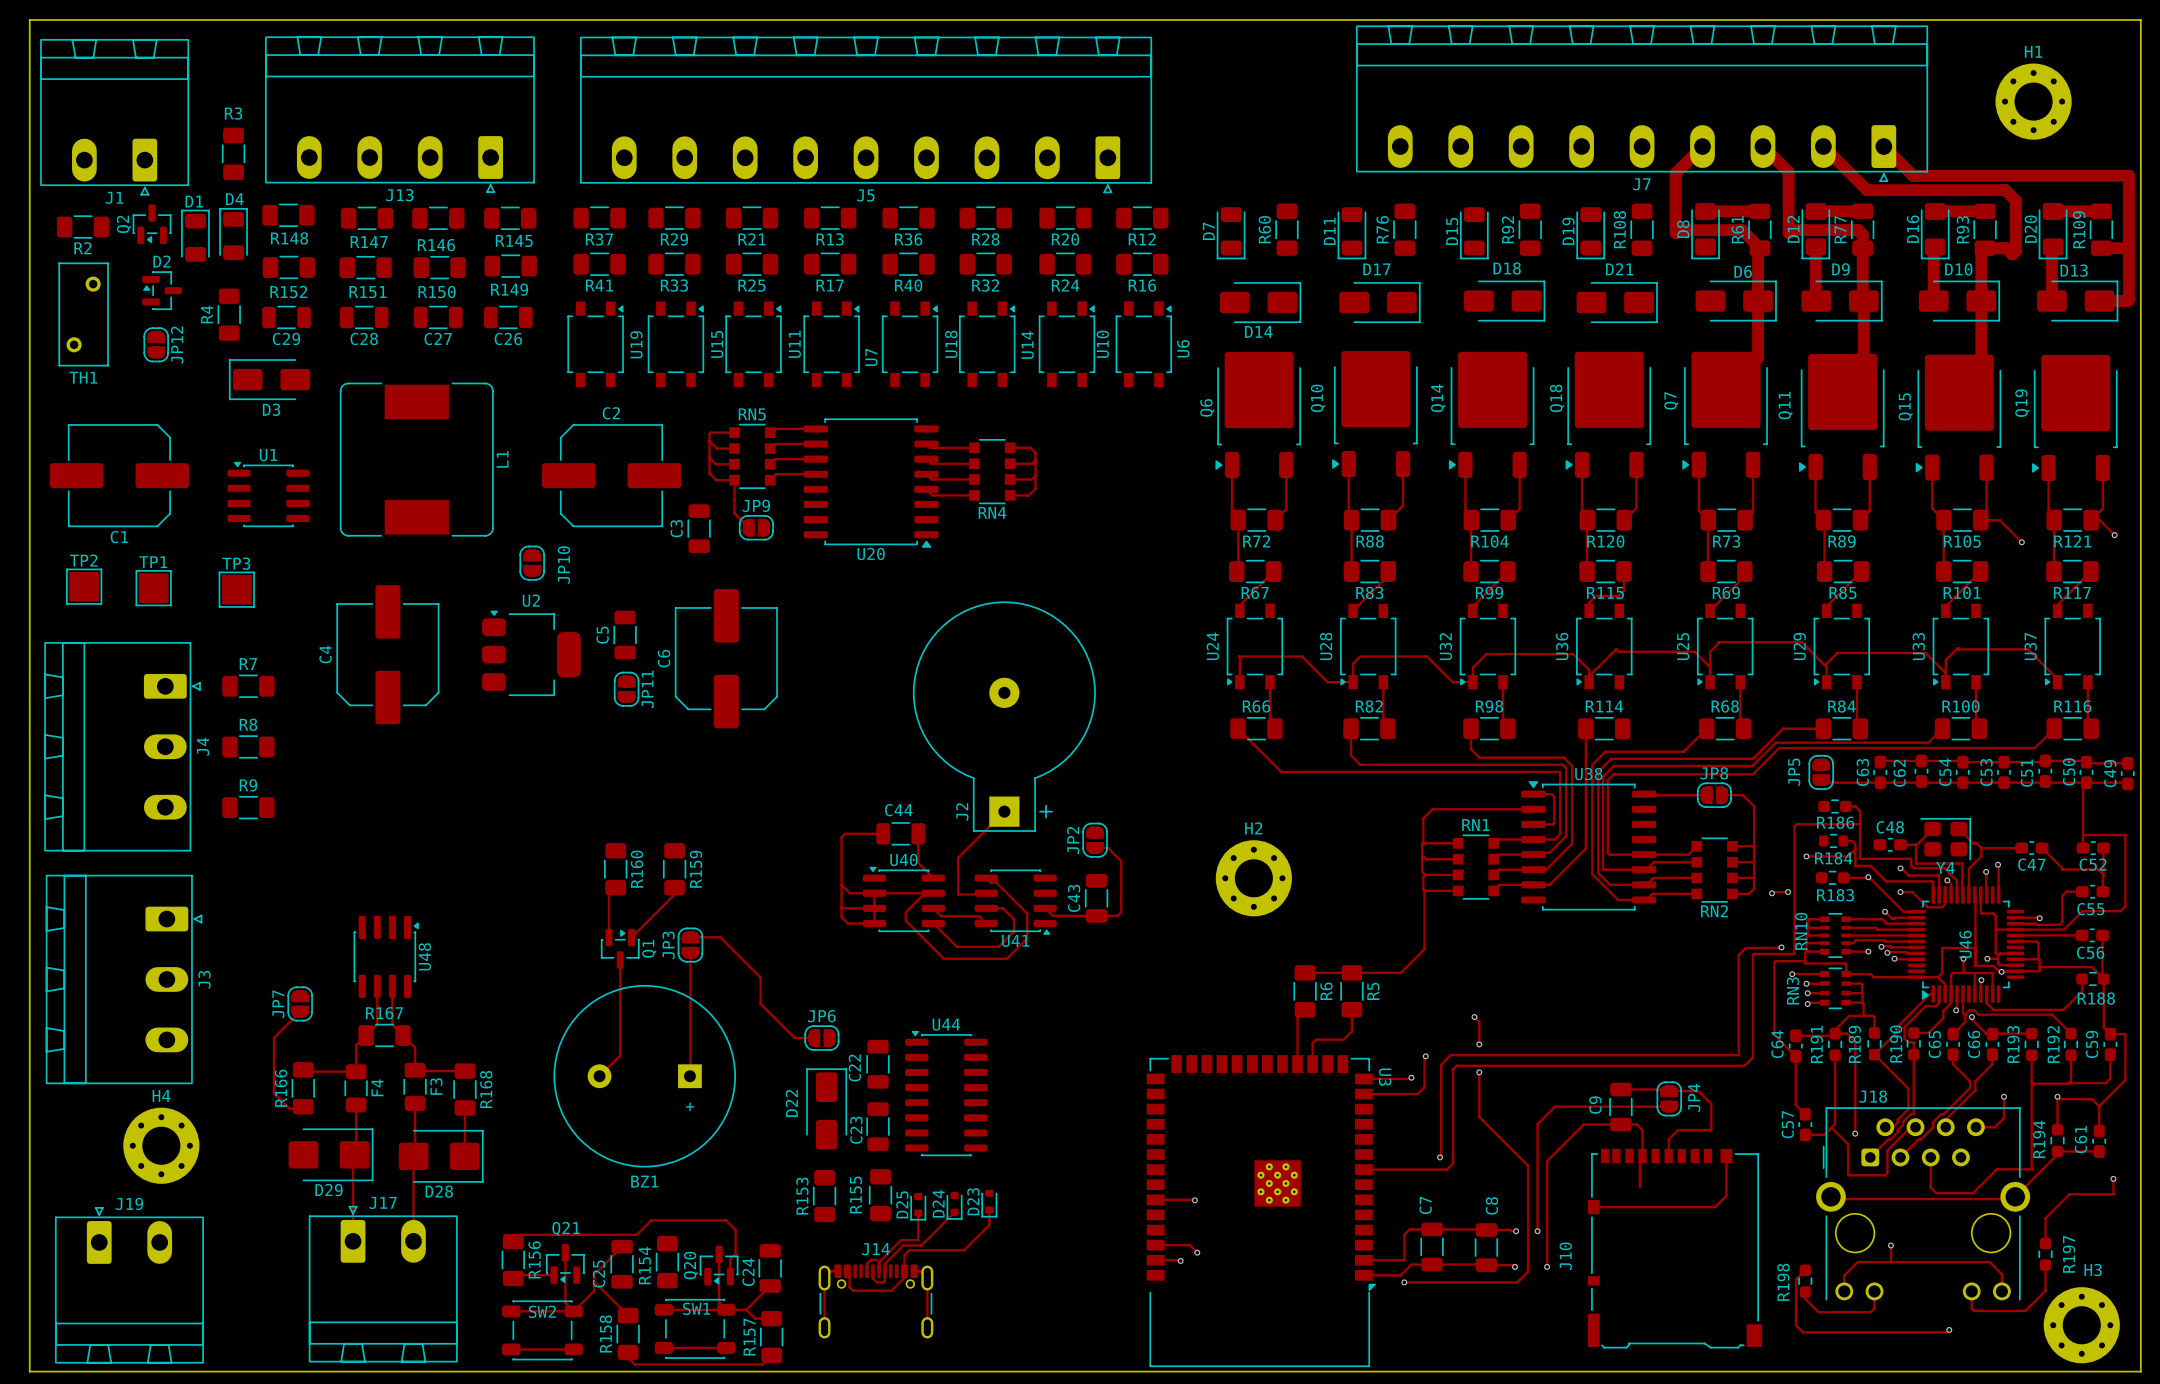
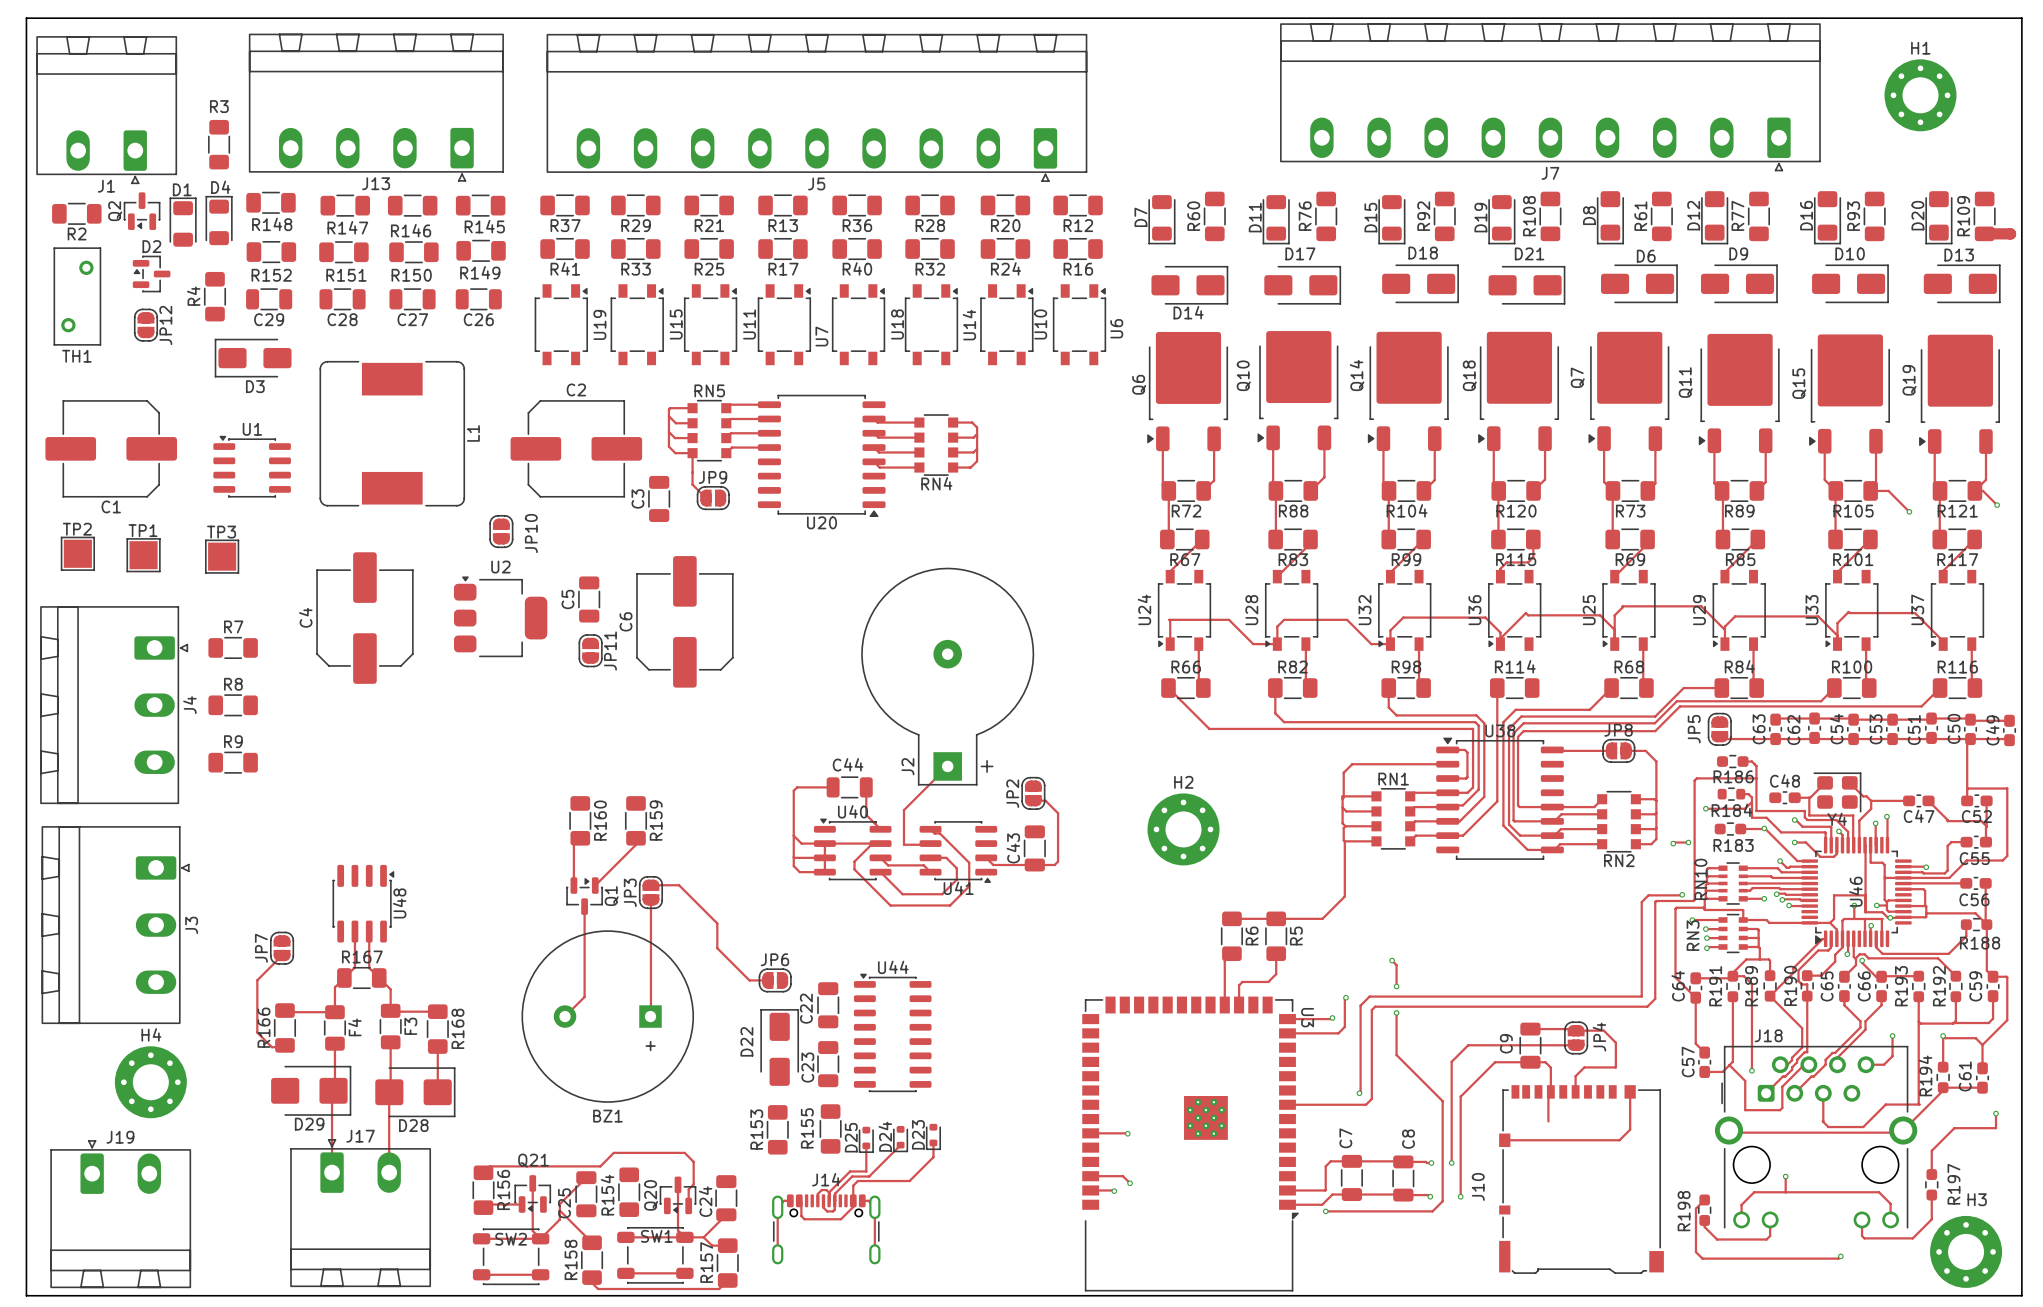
track: (1702, 146) (1675, 173) (1675, 232) (1678, 230) (1741, 230) (1759, 248) (1758, 250) (1758, 357) (1725, 389) -> none
track: (1762, 146) (1788, 172) (1788, 232) (1791, 230) (1858, 230) (1862, 234) (1863, 370) (1842, 392) -> none
track: (1823, 146) (1866, 190) (2005, 190) (2015, 200) (2015, 250) (2012, 254) (2006, 248) (1985, 248) (1981, 251) (1981, 370) (1959, 392) -> none
track: (1883, 146) (1913, 175) (2128, 175) (2128, 299) (2099, 301) -> none
track: (1759, 211) (1705, 211) -> none
track: (1862, 211) (1815, 211) -> none
track: (1985, 211) (1935, 211) -> none
track: (2101, 211) (2053, 211) -> none
track: (1815, 246) (1816, 301) -> none
track: (1935, 246) (1933, 301) -> none
track: (2053, 246) (2051, 301) -> none

